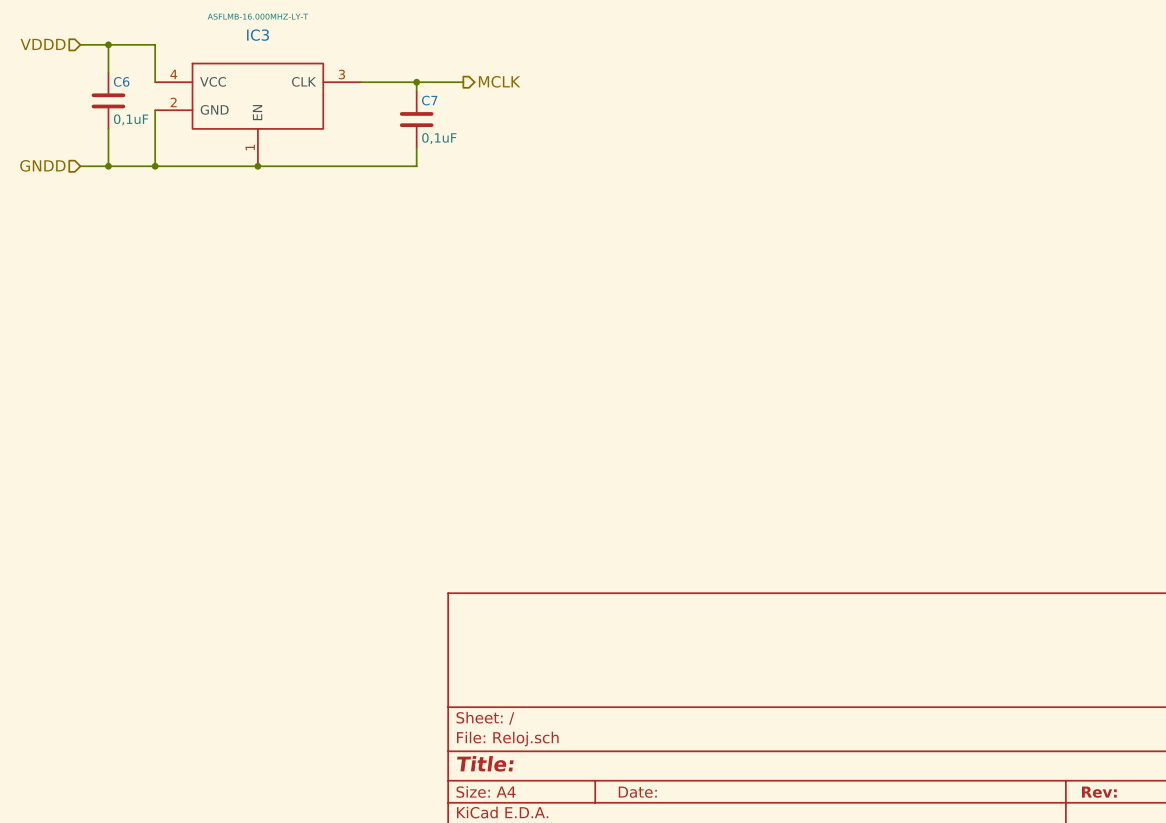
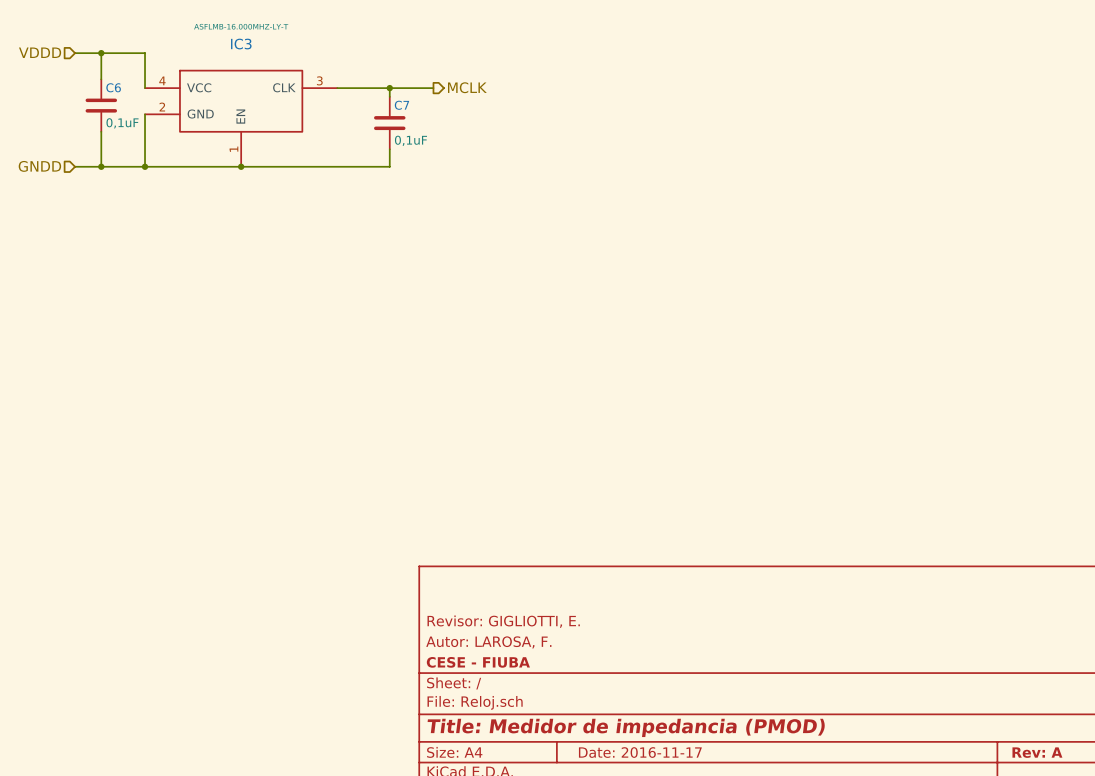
title block: none -> Revisor: GIGLIOTTI, E. (503, 621)
title block: none -> Autor: LAROSA, F. (488, 642)
title block: none -> CESE - FIUBA (478, 662)
title block: Title: (485, 763) -> Title: Medidor de impedancia (PMOD) (626, 727)
title block: Date: (637, 792) -> Date: 2016-11-17 (640, 752)
title block: Rev: (1099, 792) -> Rev: A (1037, 752)

